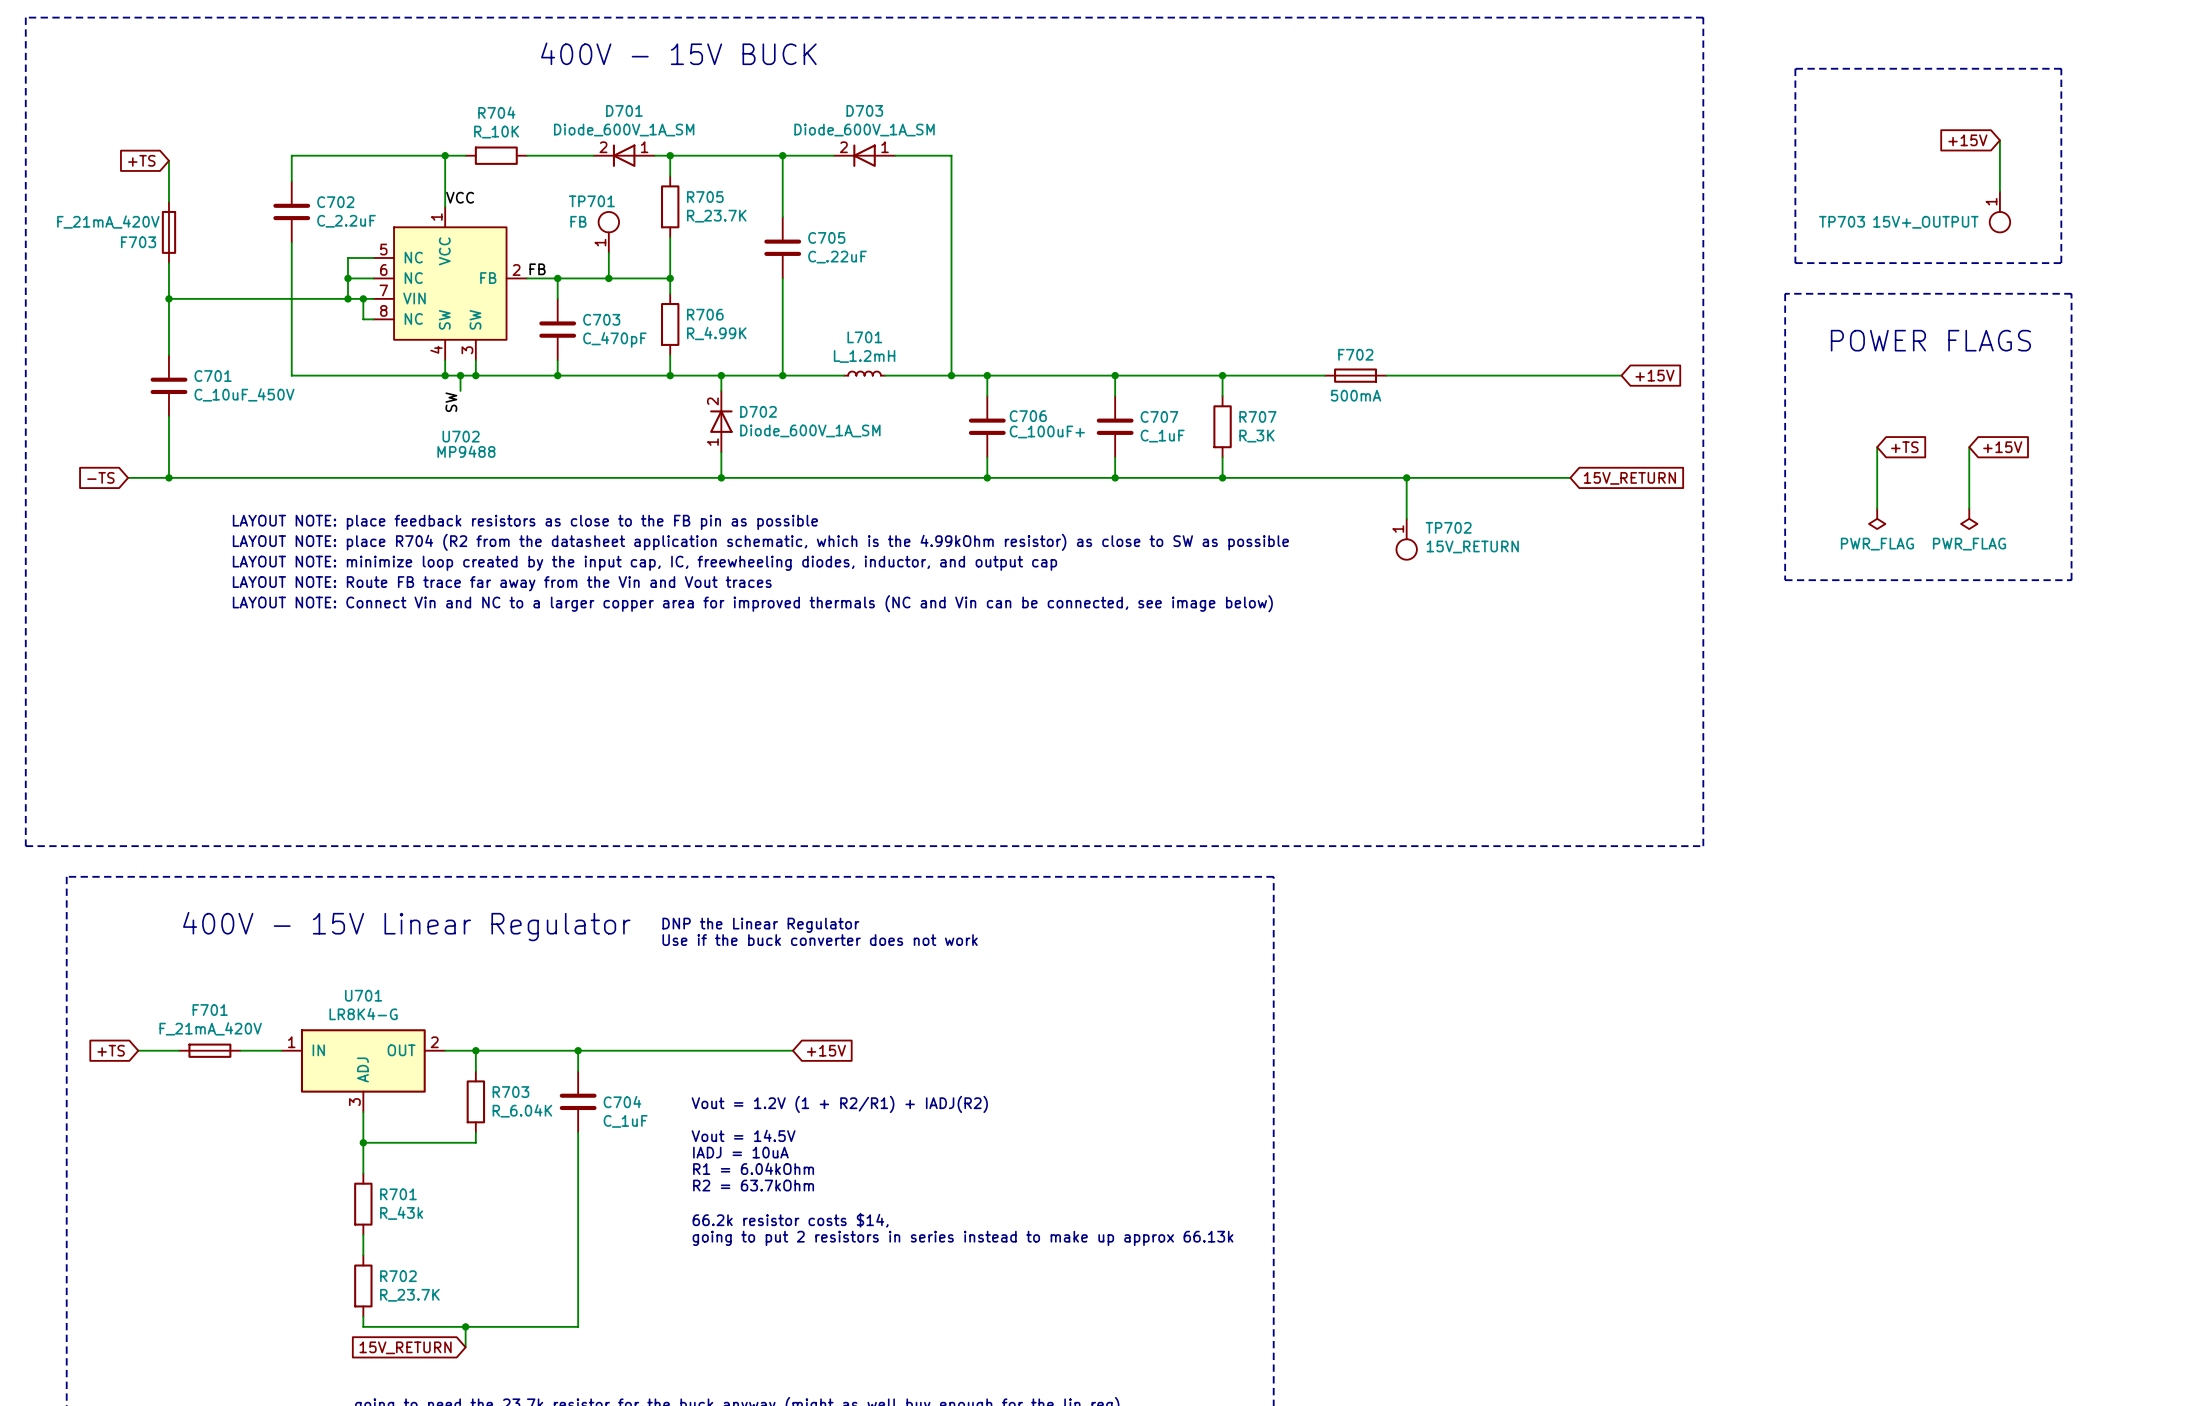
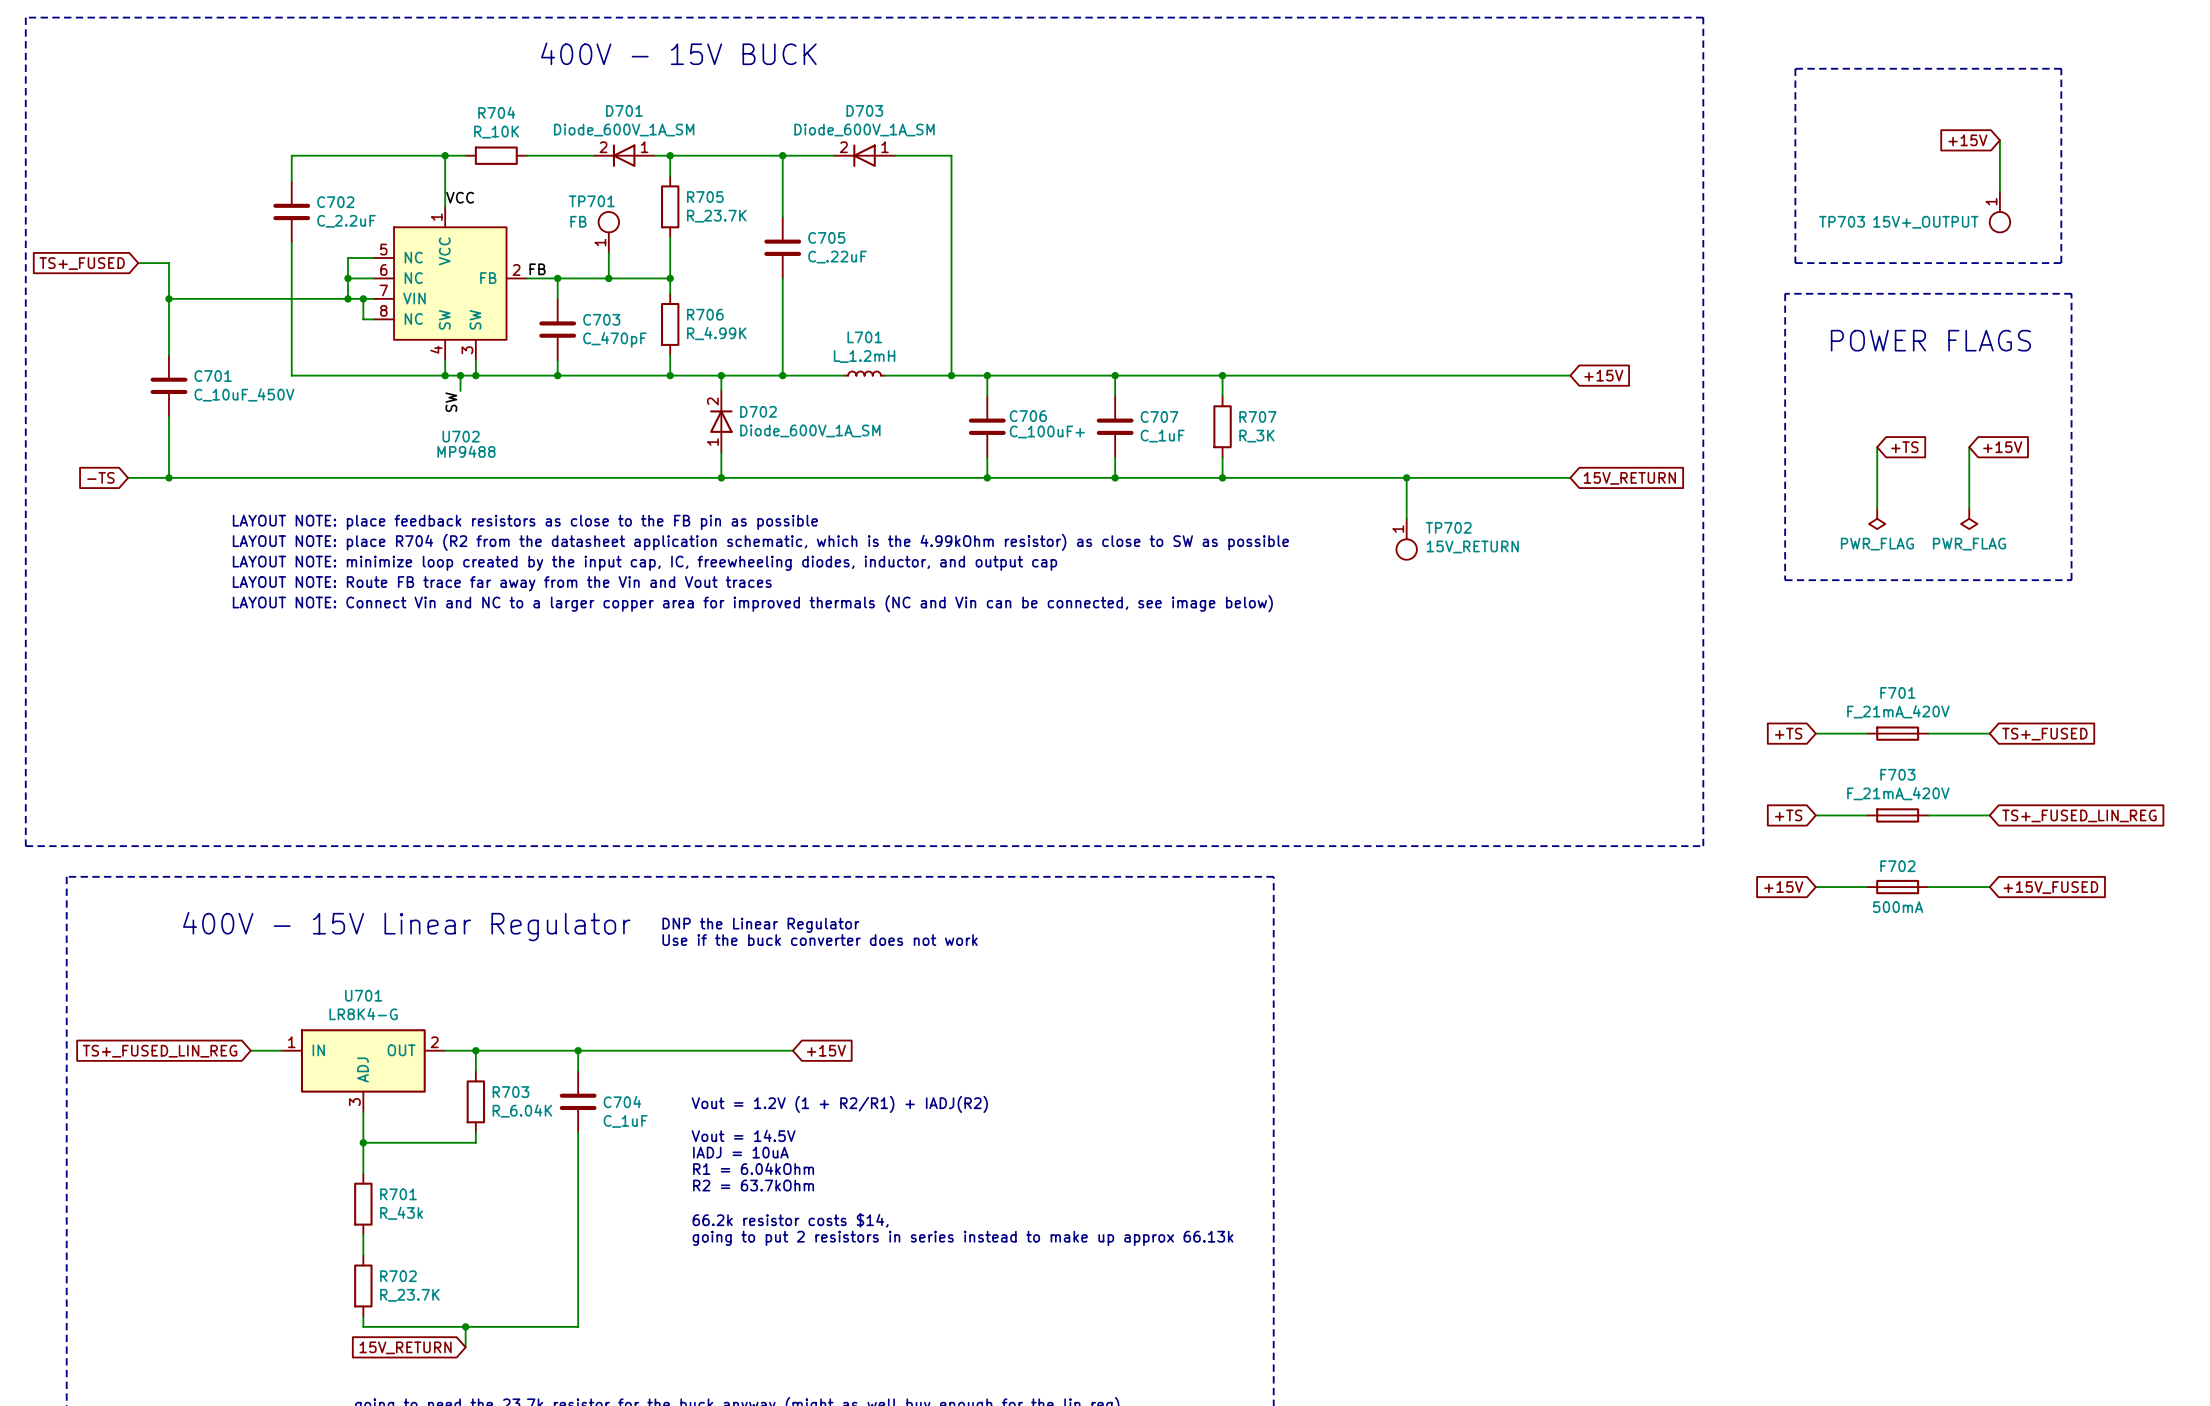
global label: +TS (141, 160) -> none
wire: (168, 160) (168, 201) -> none
F703 value position: F_21mA_420V (108, 222) -> F_21mA_420V (1898, 793)
F703 rotation: 0° (168, 232) -> 90° clockwise (1897, 815)
F703 position: (168, 232) -> (1897, 815)
global label: none -> TS+_FUSED (82, 263)
wire: none -> (138, 263) (168, 263)
F702 position: (1355, 375) -> (1897, 887)
wire: (1570, 375) (1621, 375) -> none
global label position: +15V (1654, 375) -> +15V (1603, 375)
global label: none -> +TS (1788, 733)
wire: none -> (1815, 733) (1866, 733)
wire: none -> (1928, 733) (1989, 733)
global label: none -> TS+_FUSED (2044, 734)
global label: none -> +TS (1788, 815)
wire: none -> (1815, 815) (1866, 815)
wire: none -> (1928, 815) (1989, 815)
global label: none -> TS+_FUSED_LIN_REG (2079, 815)
global label: none -> +15V (1783, 887)
wire: none -> (1815, 887) (1866, 887)
wire: none -> (1928, 887) (1989, 887)
global label: none -> +15V_FUSED (2050, 887)
global label: +TS (111, 1050) -> none
wire: (138, 1050) (179, 1050) -> none
F701 position: (209, 1050) -> (1897, 733)
wire: (240, 1050) (250, 1050) -> none
global label: none -> TS+_FUSED_LIN_REG (160, 1051)

